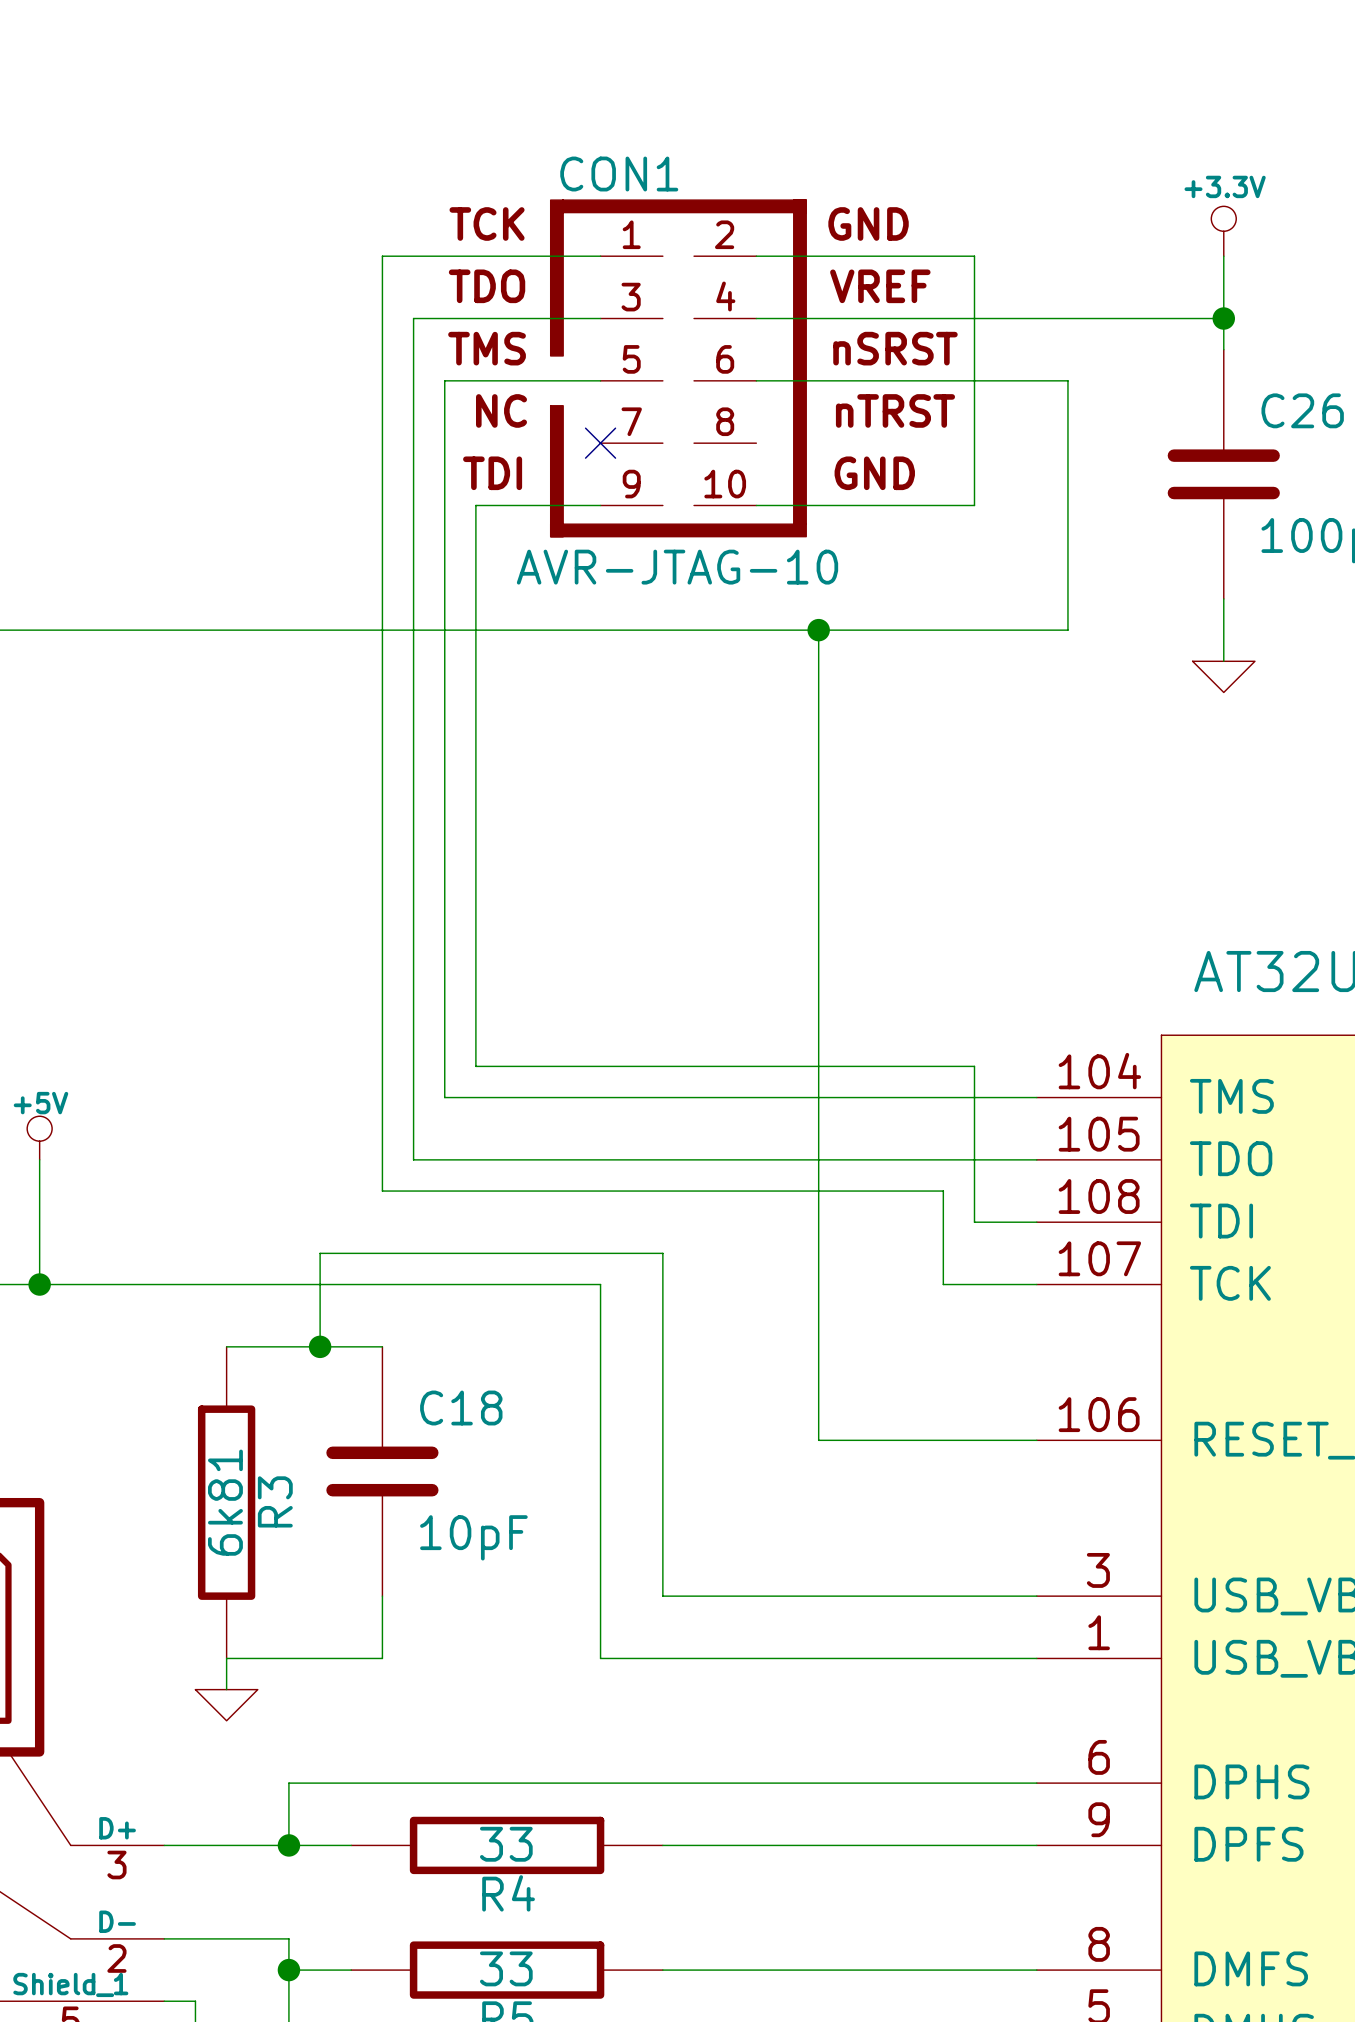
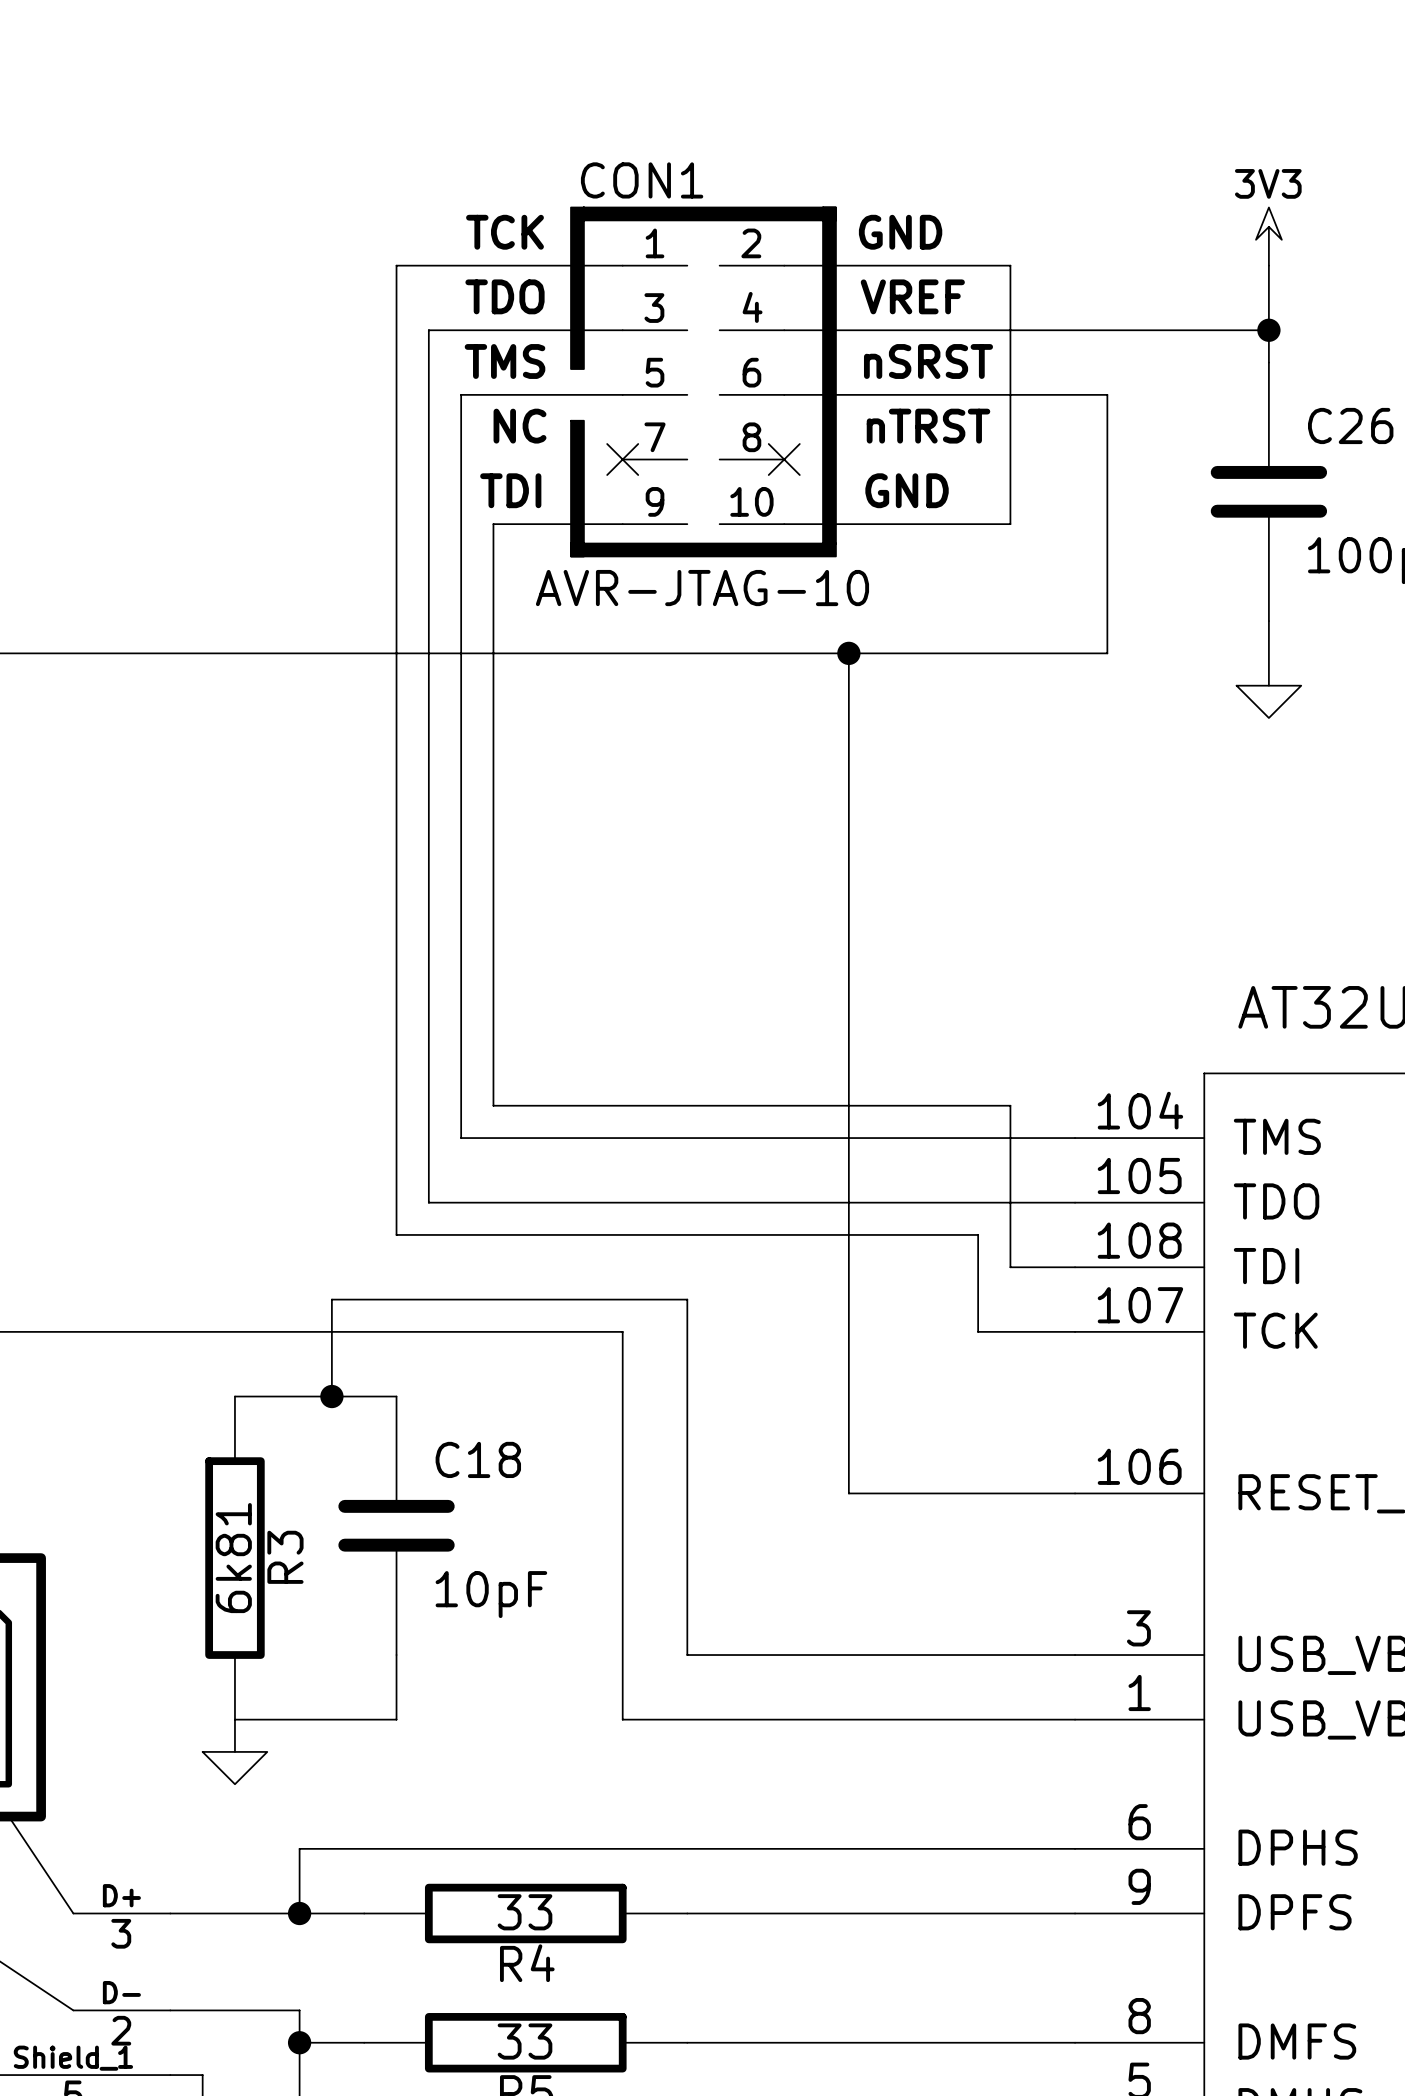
power symbol: +3.3V (1223, 231) -> 3V3 (1268, 236)
no-connect mark: none -> (784, 459)
power symbol: +5V (39, 1138) -> none
wire: (39, 1159) (39, 1284) -> none
junction: (39, 1284) -> none

